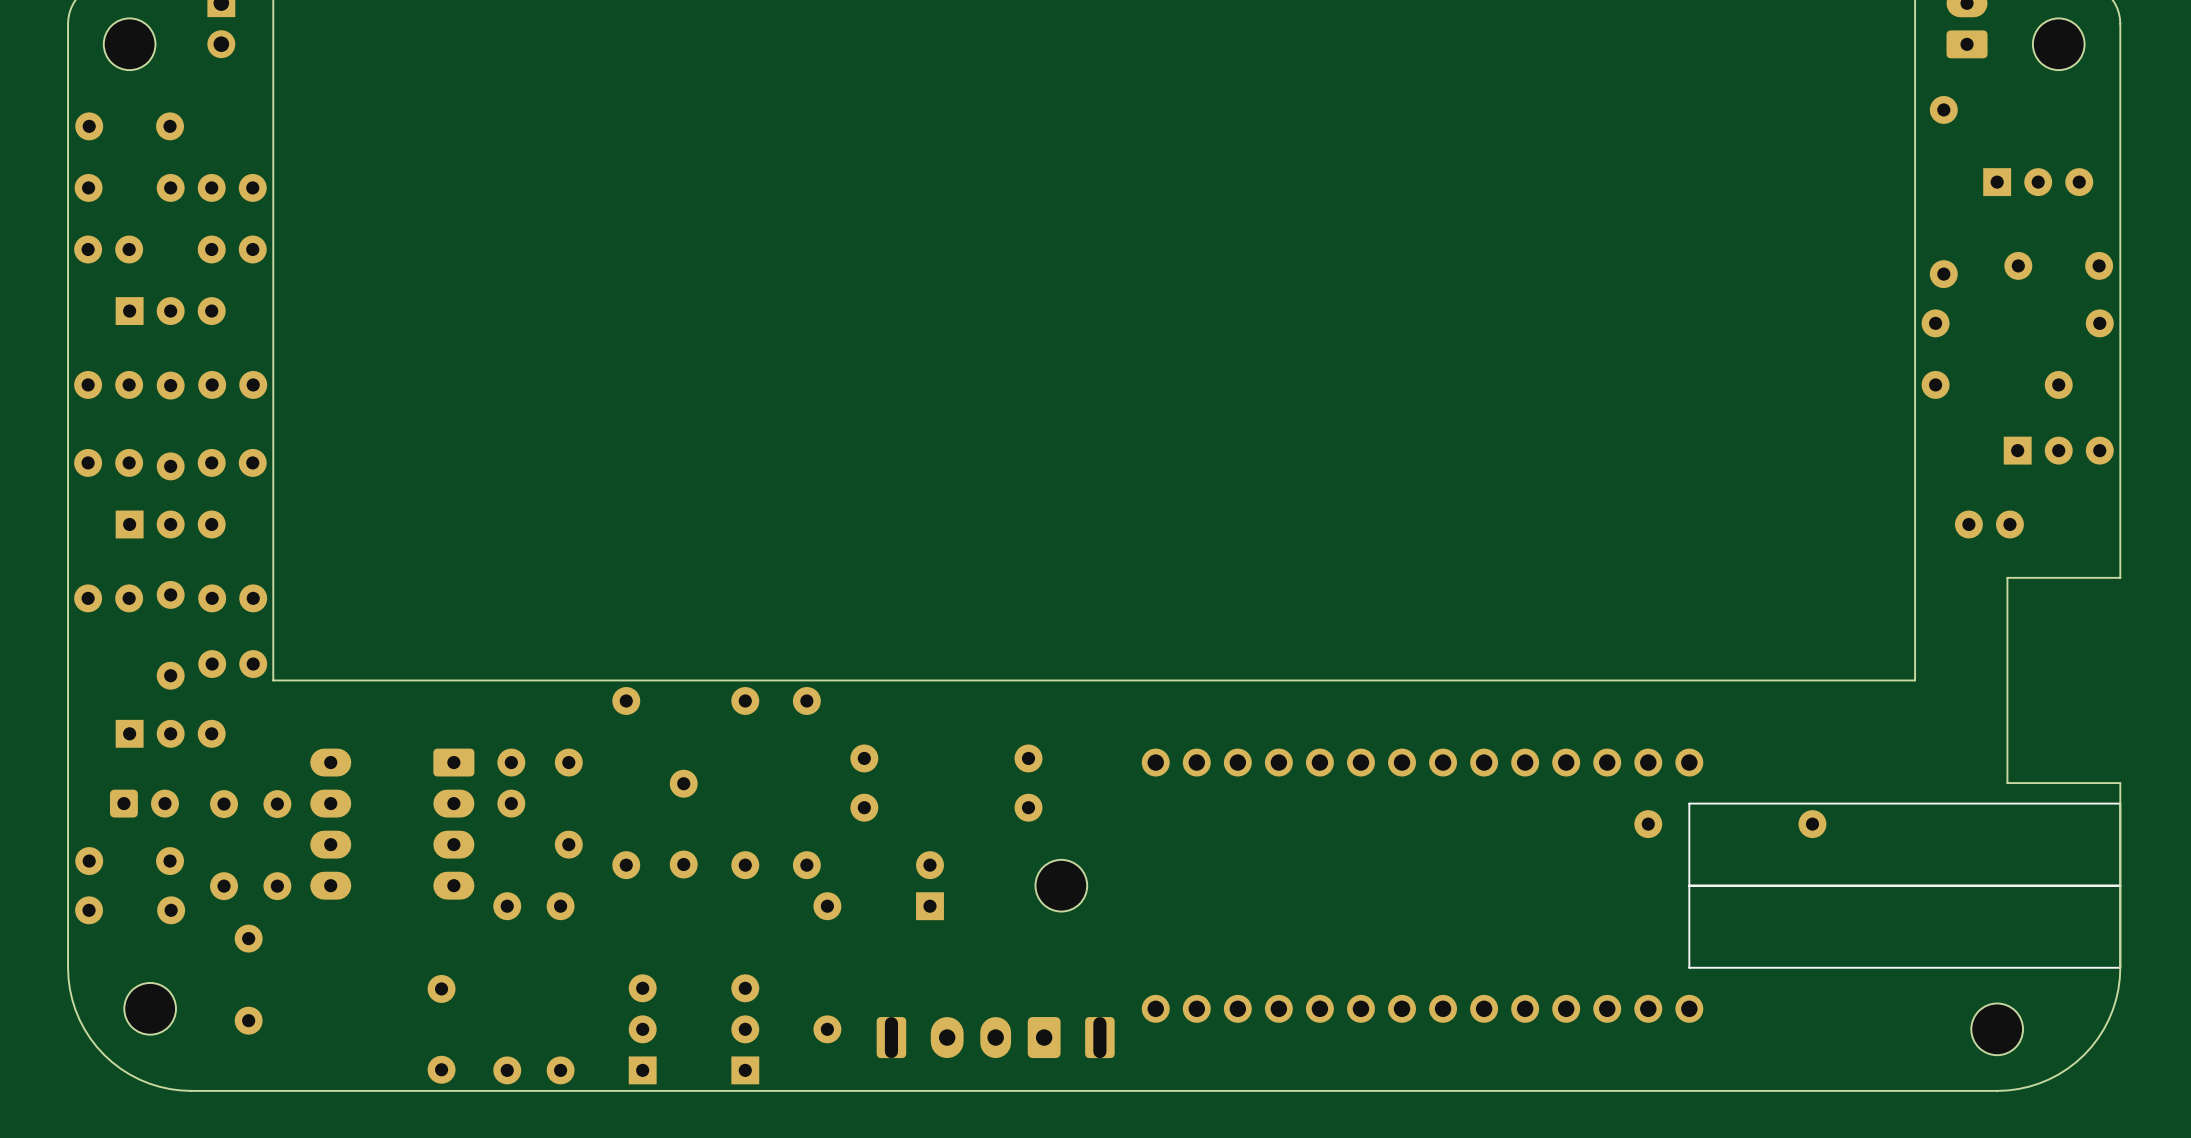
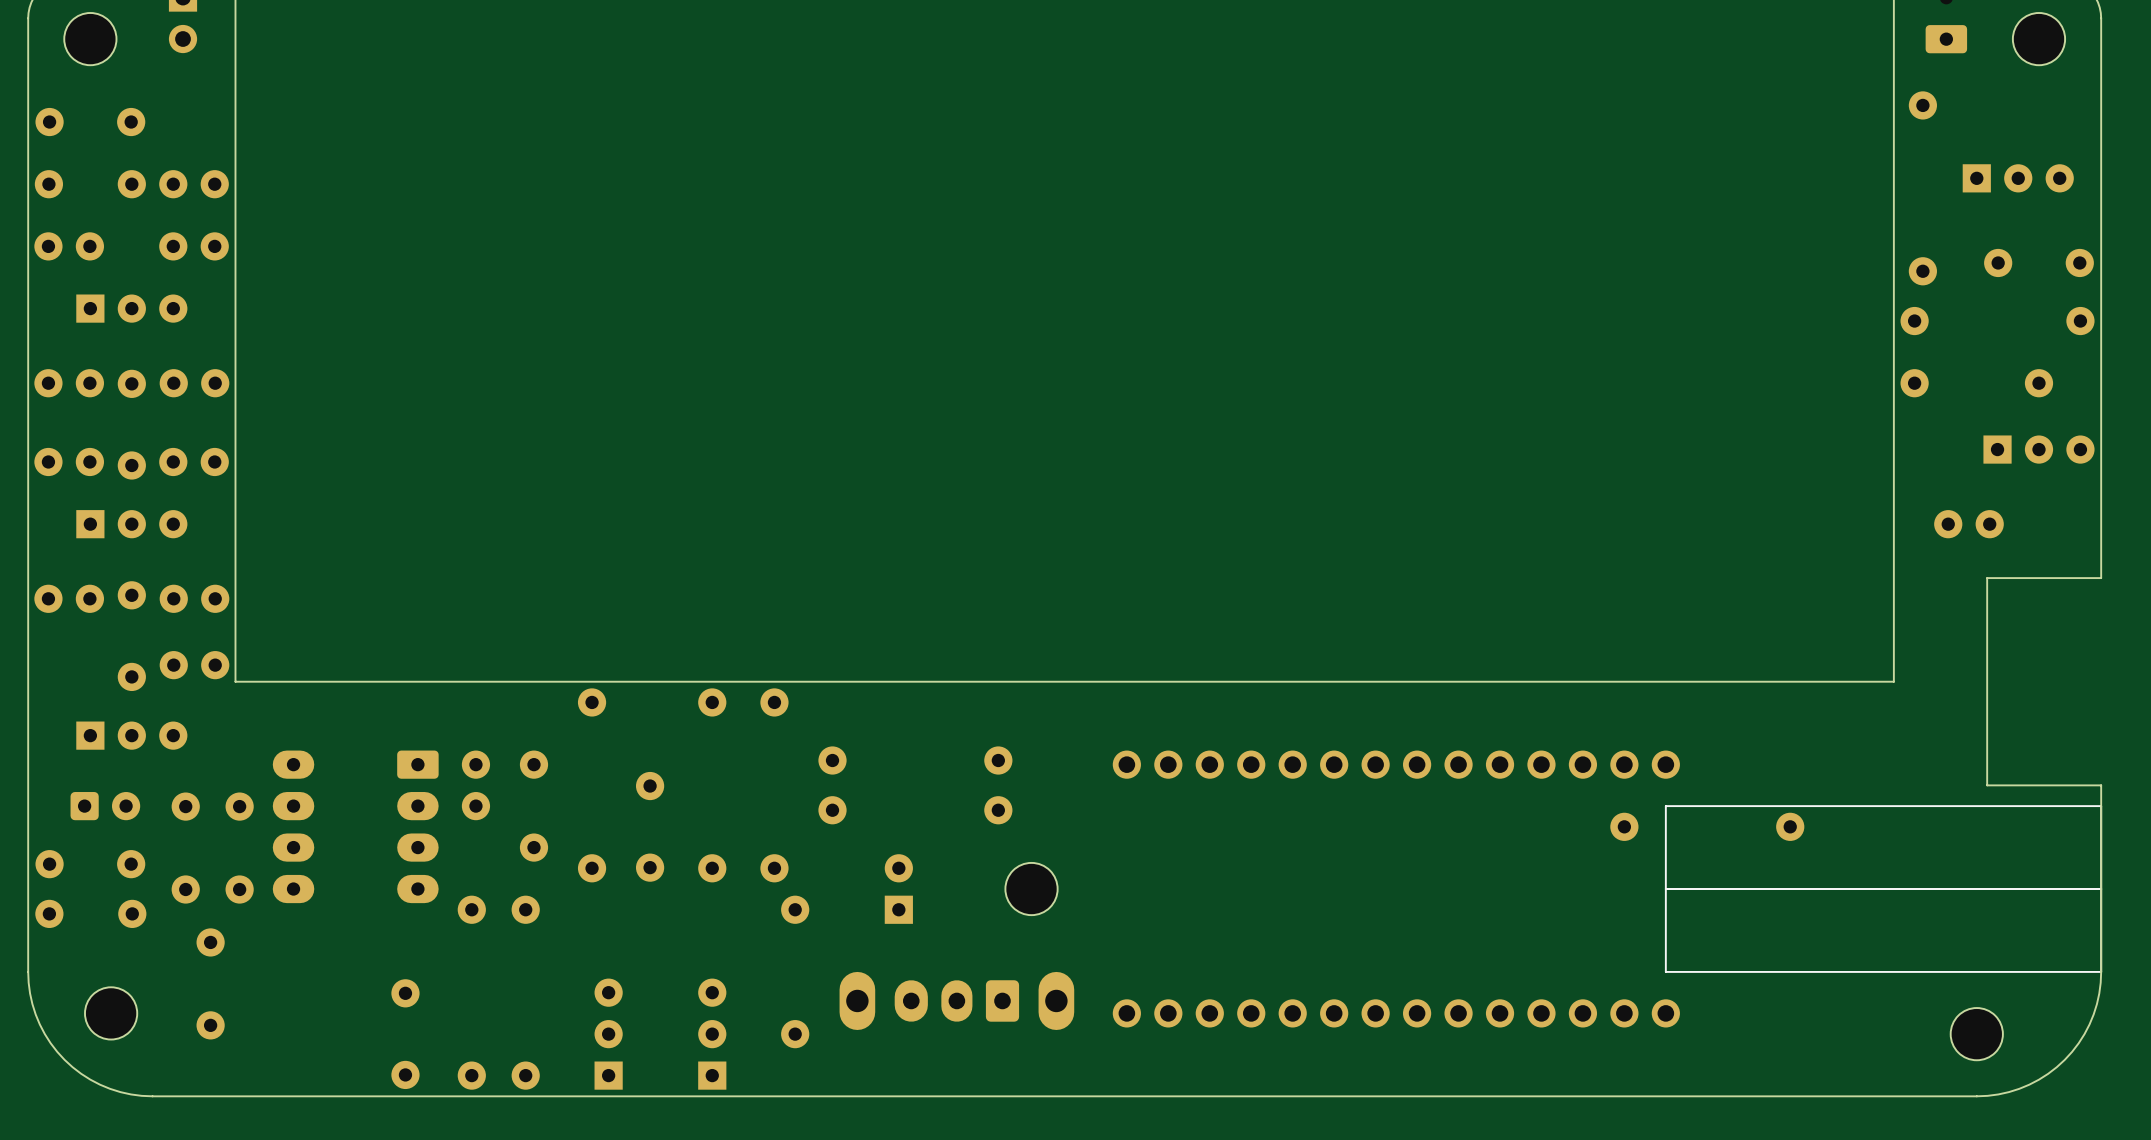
part: none -> (956, 1000)
part: (995, 1037) -> none

